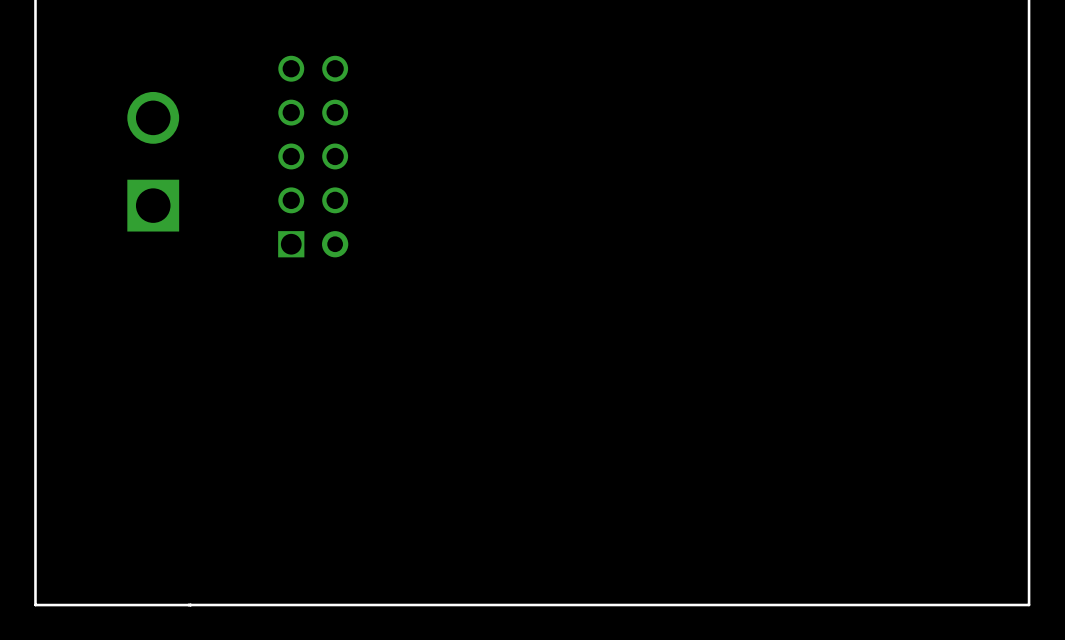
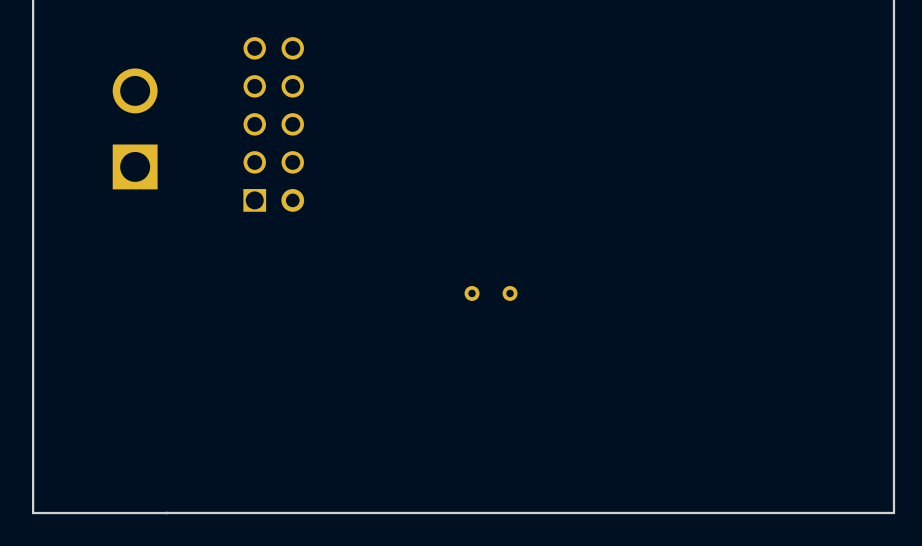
part: none -> (491, 293)

